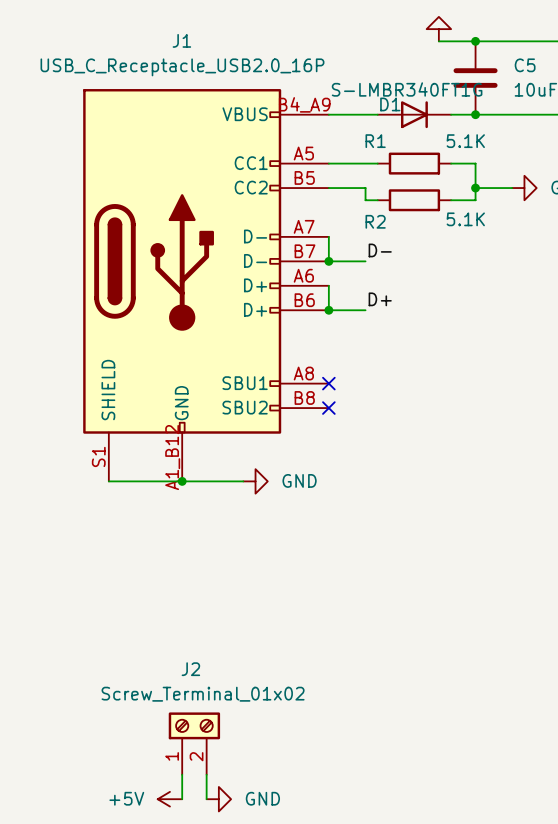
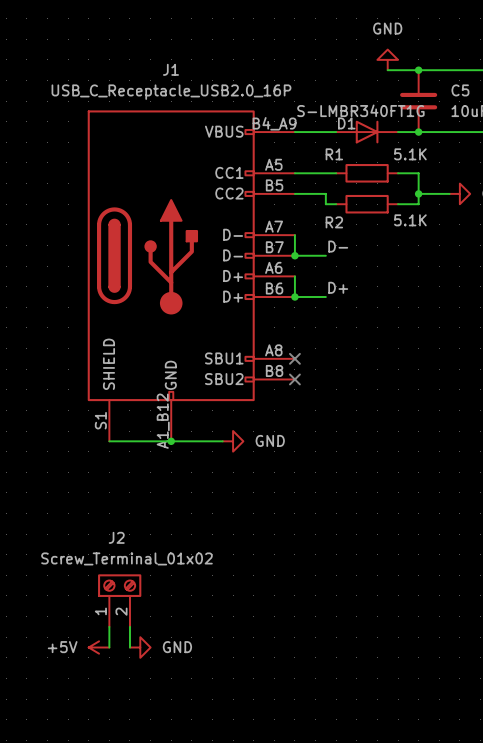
J2 position: (194, 743) -> (119, 600)
wire: (182, 774) (182, 799) -> (129, 626) (129, 647)
wire: (206, 774) (206, 799) -> (109, 626) (109, 647)
power symbol position: +5V (169, 799) -> +5V (99, 647)
power symbol position: GND (218, 799) -> GND (140, 647)

